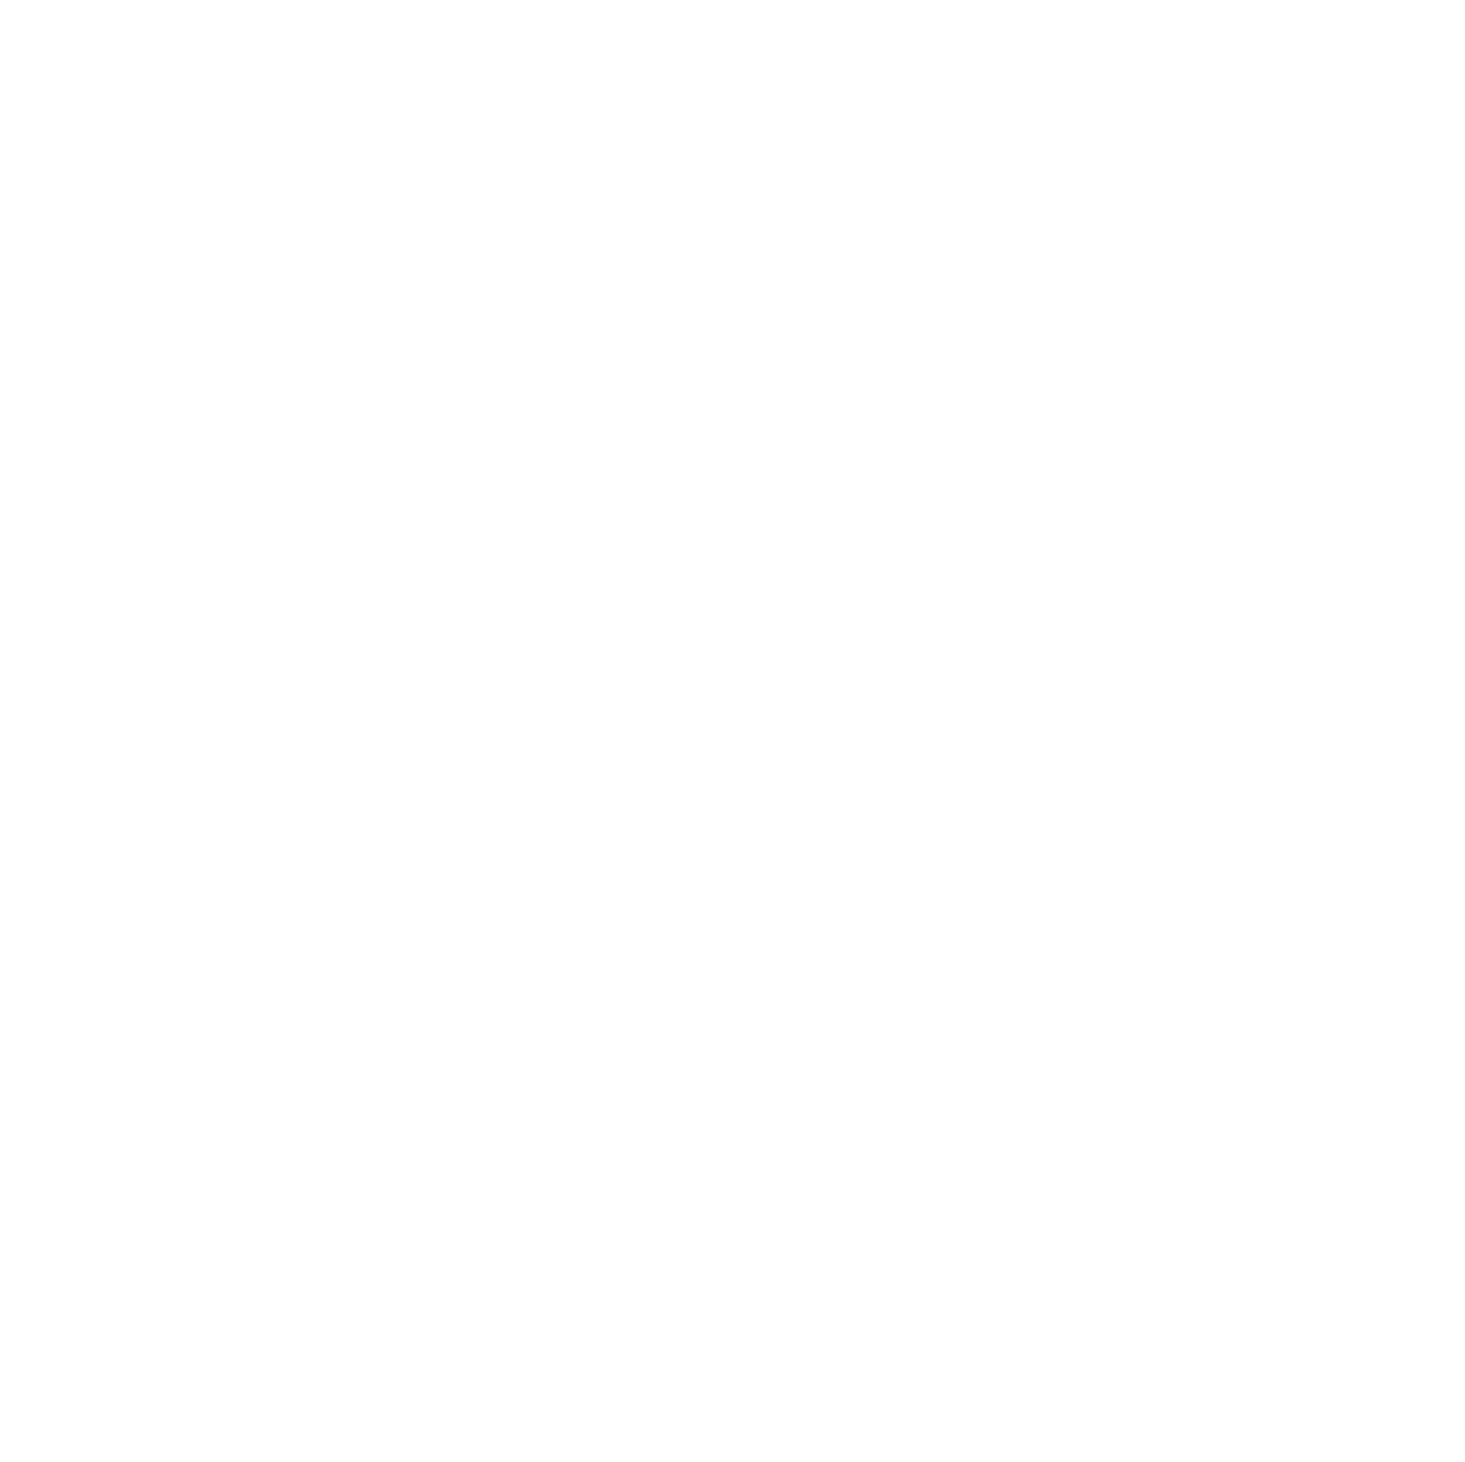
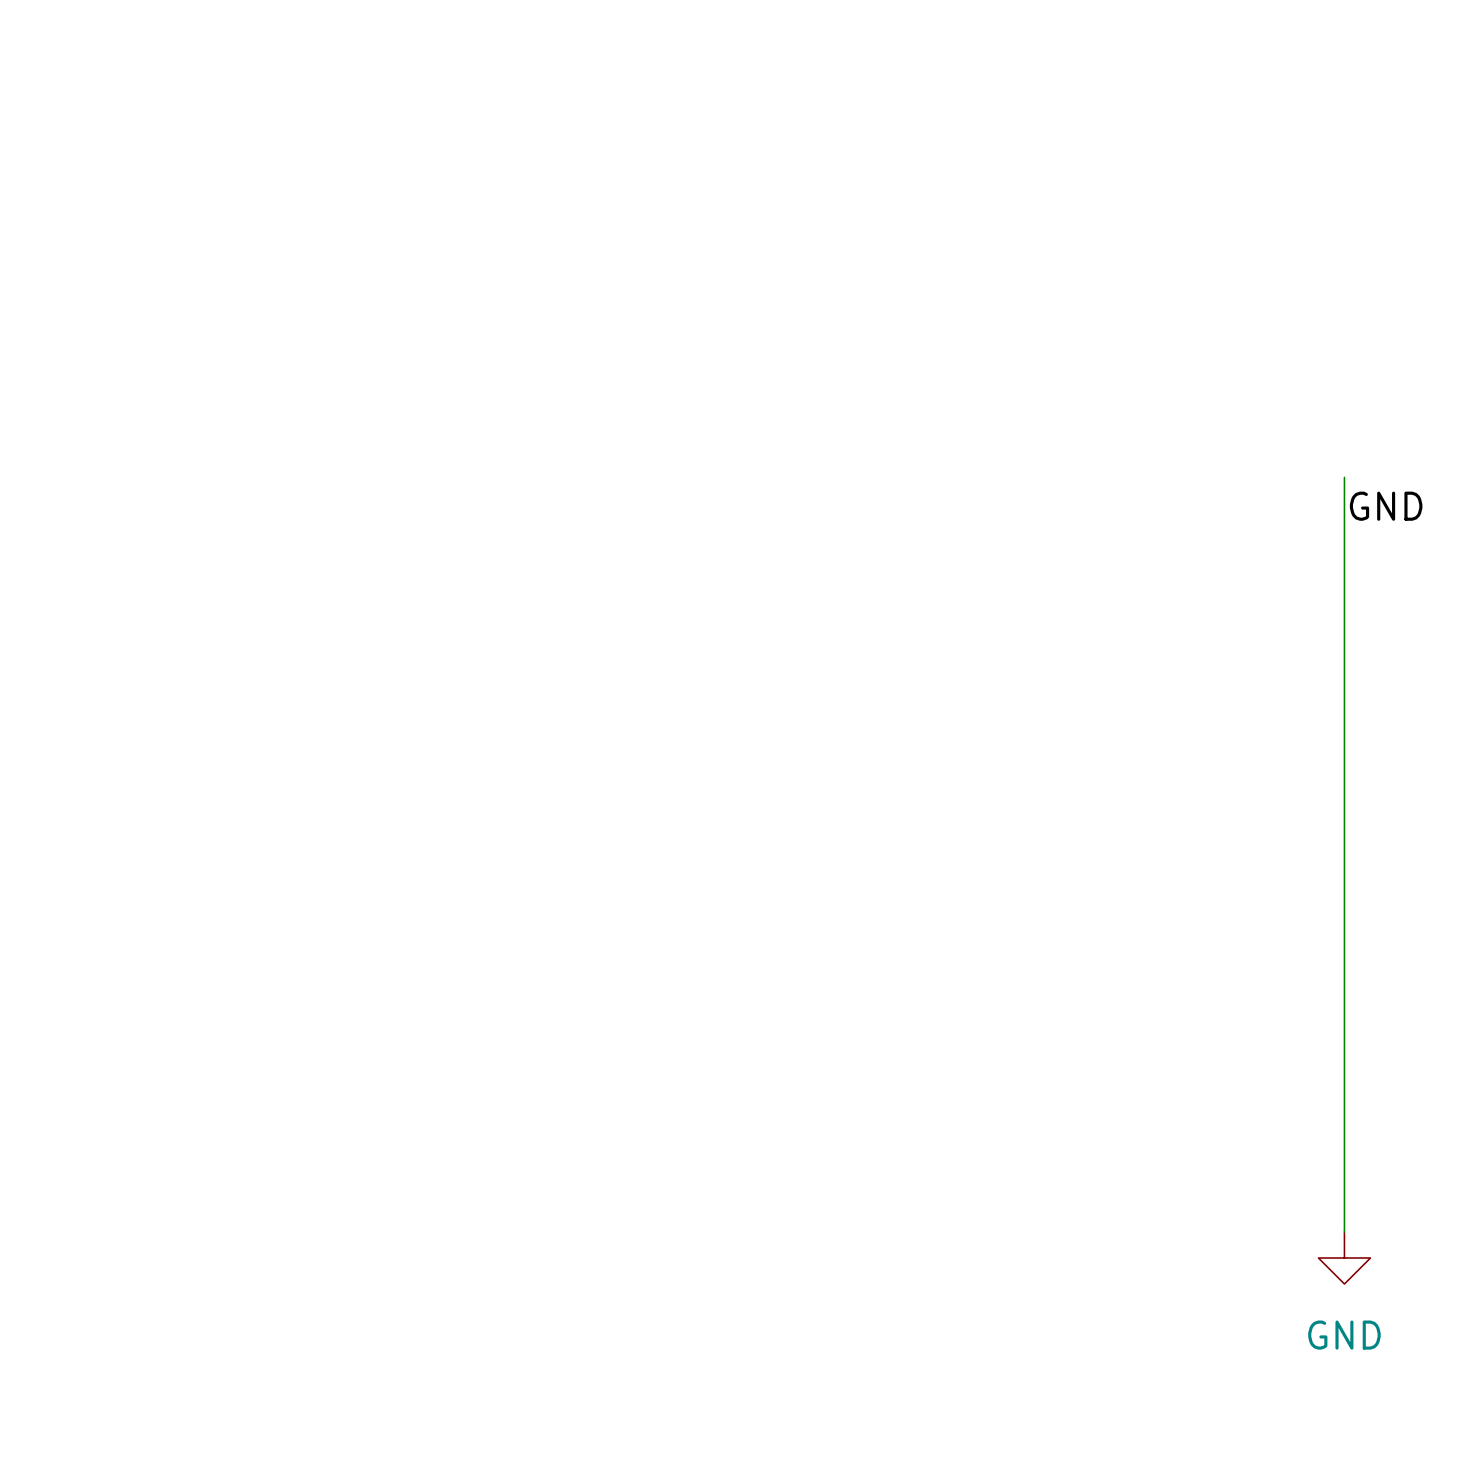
wire: none -> (1344, 477) (1344, 1231)
label: none -> GND (1386, 506)
power symbol: none -> GND (1344, 1257)

